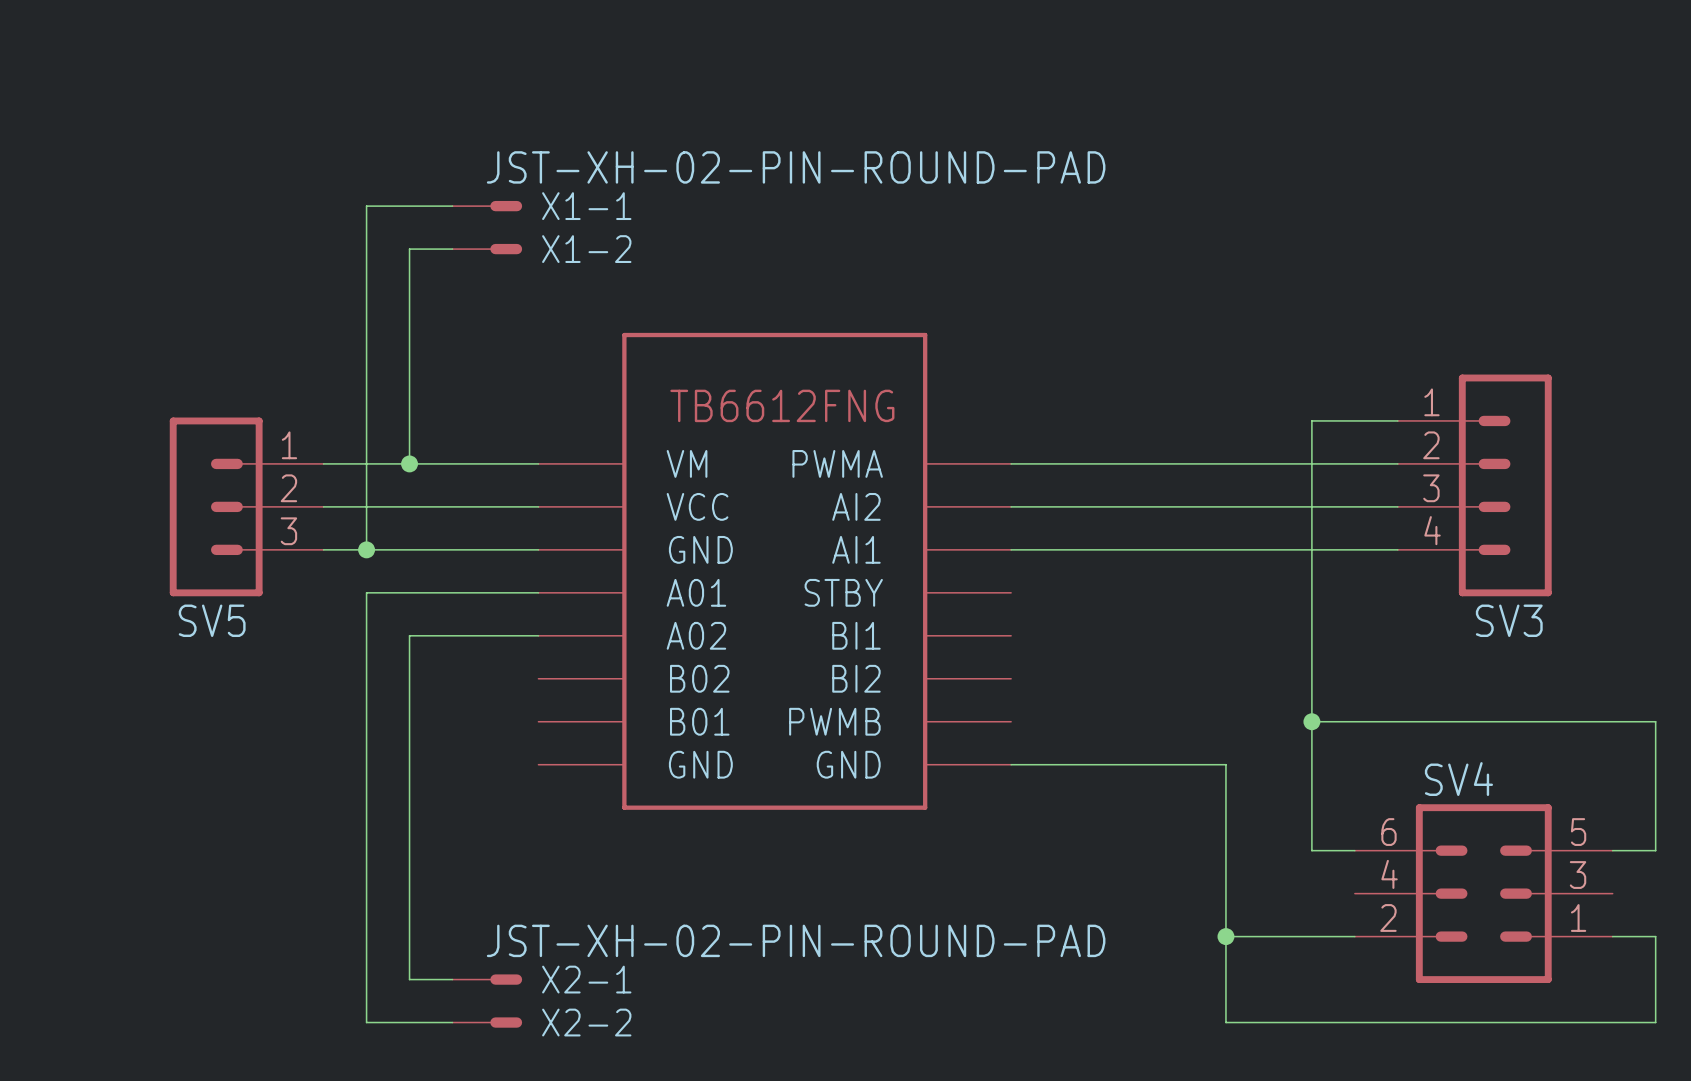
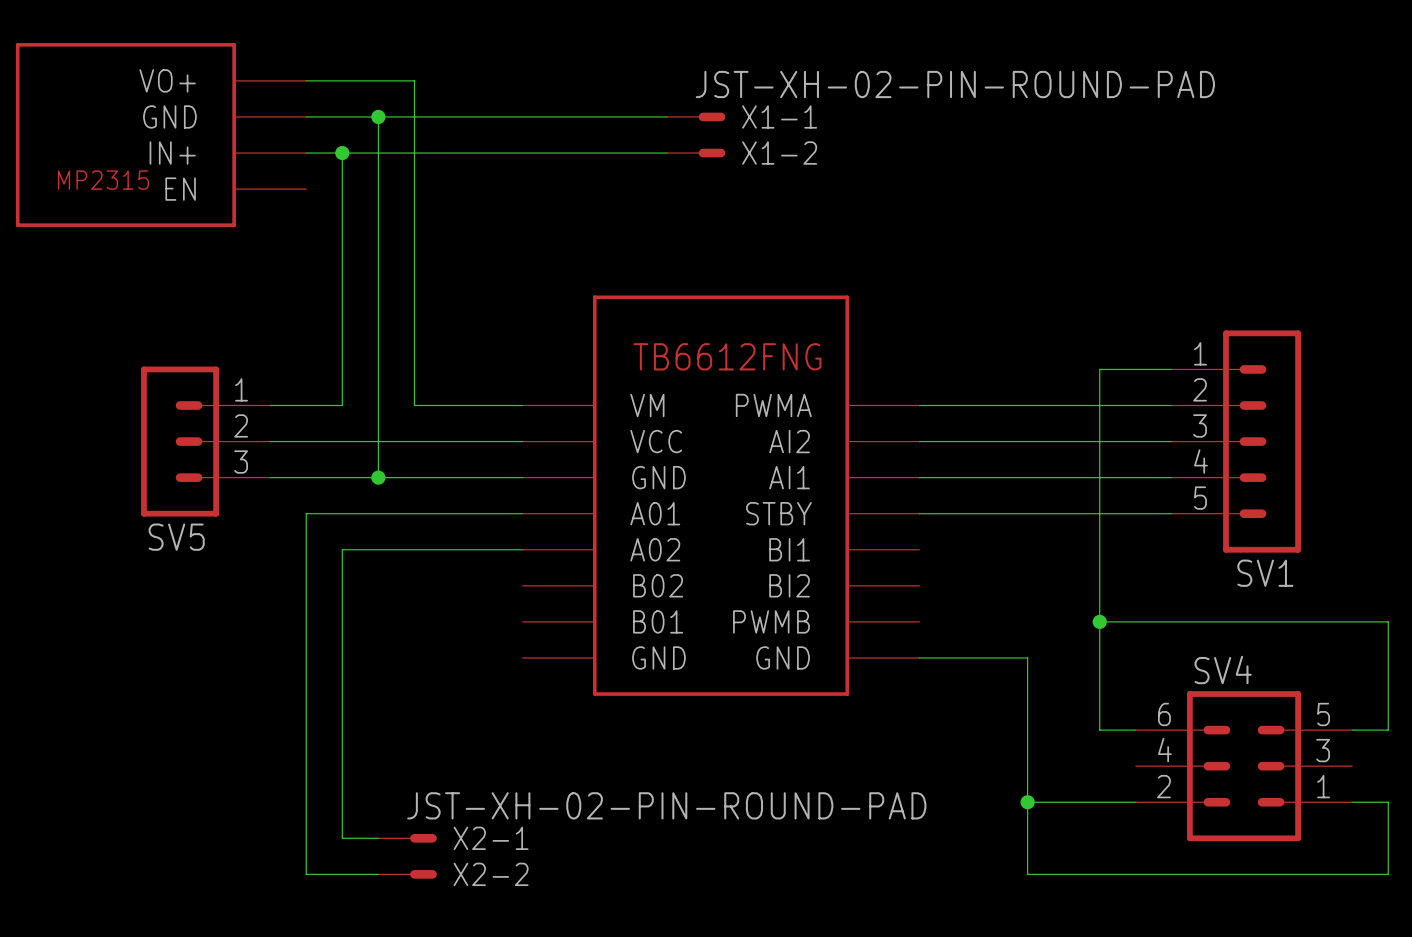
wire: none -> (306, 116) (666, 116)
wire: none -> (378, 116) (378, 477)
junction: none -> (378, 116)
part: none -> (161, 134)
wire: none -> (306, 153) (666, 153)
junction: none -> (342, 153)
wire: (452, 206) (366, 206) (366, 549) -> none
X1-1 position: (487, 206) -> (696, 116)
wire: (409, 249) (452, 249) -> (342, 225) (342, 153)
X1-2 position: (487, 249) -> (696, 153)
wire: (409, 463) (495, 463) -> (306, 80) (414, 80) (414, 405)
junction: (409, 463) -> none
SV3: (1474, 485) -> none
SV1: none -> (1236, 441)
junction: (366, 549) -> none
junction: none -> (378, 477)
part position: (774, 571) -> (721, 495)
wire: none -> (919, 513) (1171, 513)

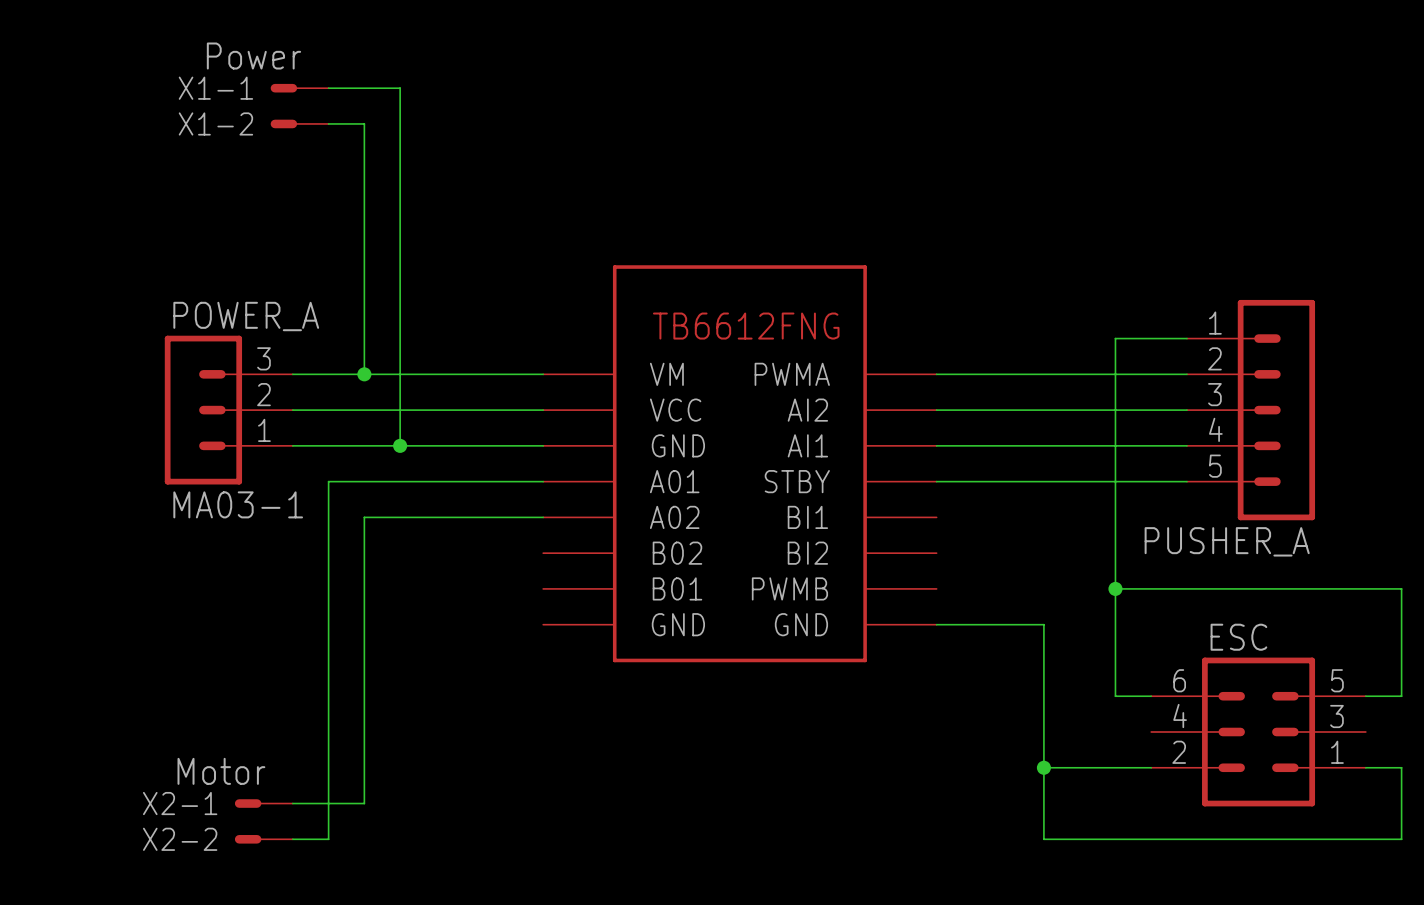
wire: (306, 80) (414, 80) (414, 405) -> (364, 374) (435, 374)
X1-1 value: JST-XH-02-PIN-ROUND-PAD (955, 84) -> Power (253, 56)
wire: (378, 116) (666, 116) -> none
junction: (378, 116) -> none
X1-1 position: (696, 116) -> (299, 88)
X1-1 rotation: 0° (712, 116) -> 180° (283, 88)
part: (161, 134) -> none
wire: (342, 153) (666, 153) -> none
junction: (342, 153) -> none
X1-2 position: (696, 153) -> (299, 123)
X1-2 rotation: 0° (712, 153) -> 180° (283, 123)
junction: none -> (364, 374)
SV5 flip: as is (180, 441) -> up-down (203, 410)
SV5 name: SV5 (176, 537) -> POWER_A (246, 316)
SV5 value: none -> MA03-1 (238, 504)
SV1 name: SV1 (1265, 573) -> PUSHER_A (1227, 541)
SV4 name: SV4 (1223, 669) -> ESC (1238, 637)
X2-1 value: JST-XH-02-PIN-ROUND-PAD (666, 805) -> Motor (221, 771)
wire: (342, 838) (378, 838) -> (364, 803) (292, 803)
X2-1 position: (407, 838) -> (263, 803)
X2-1 rotation: 0° (423, 838) -> 180° (248, 803)
wire: (306, 874) (378, 874) -> (328, 839) (292, 839)
X2-2 position: (407, 874) -> (263, 839)
X2-2 rotation: 0° (423, 874) -> 180° (248, 839)

